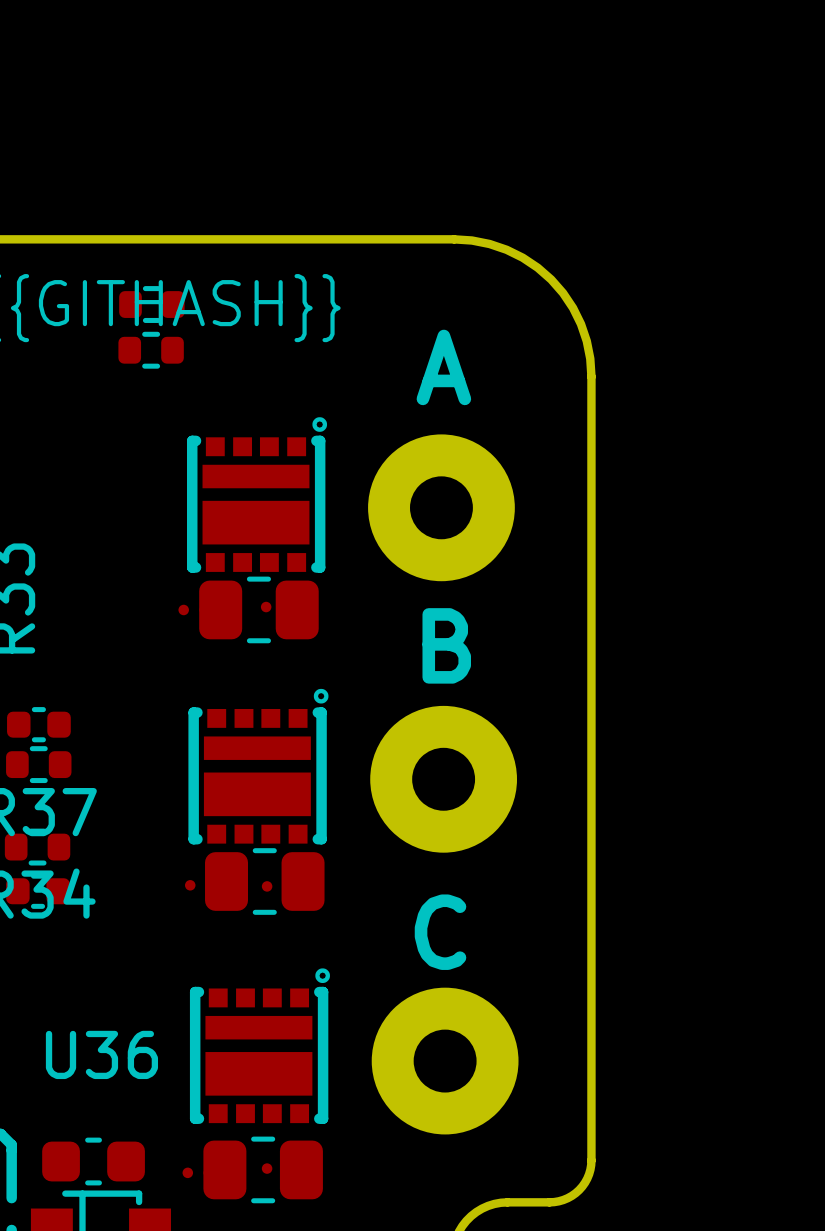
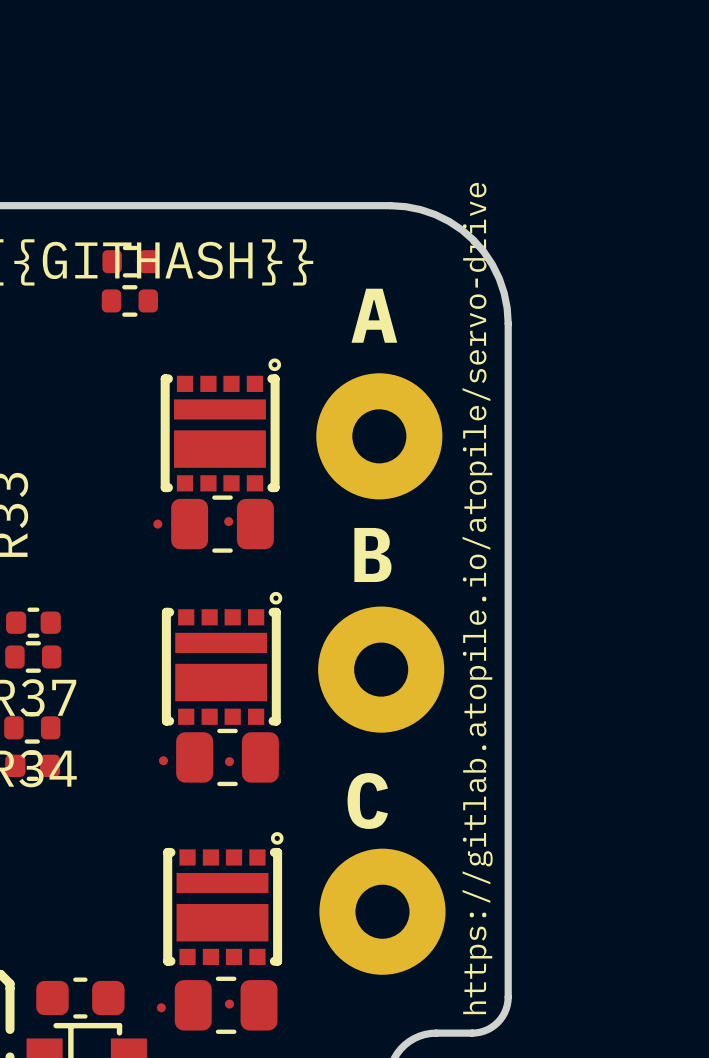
text: none -> https://gitlab.atopile.io/atopile/servo-drive (477, 598)
U36 name: U36 (101, 1054) -> none

